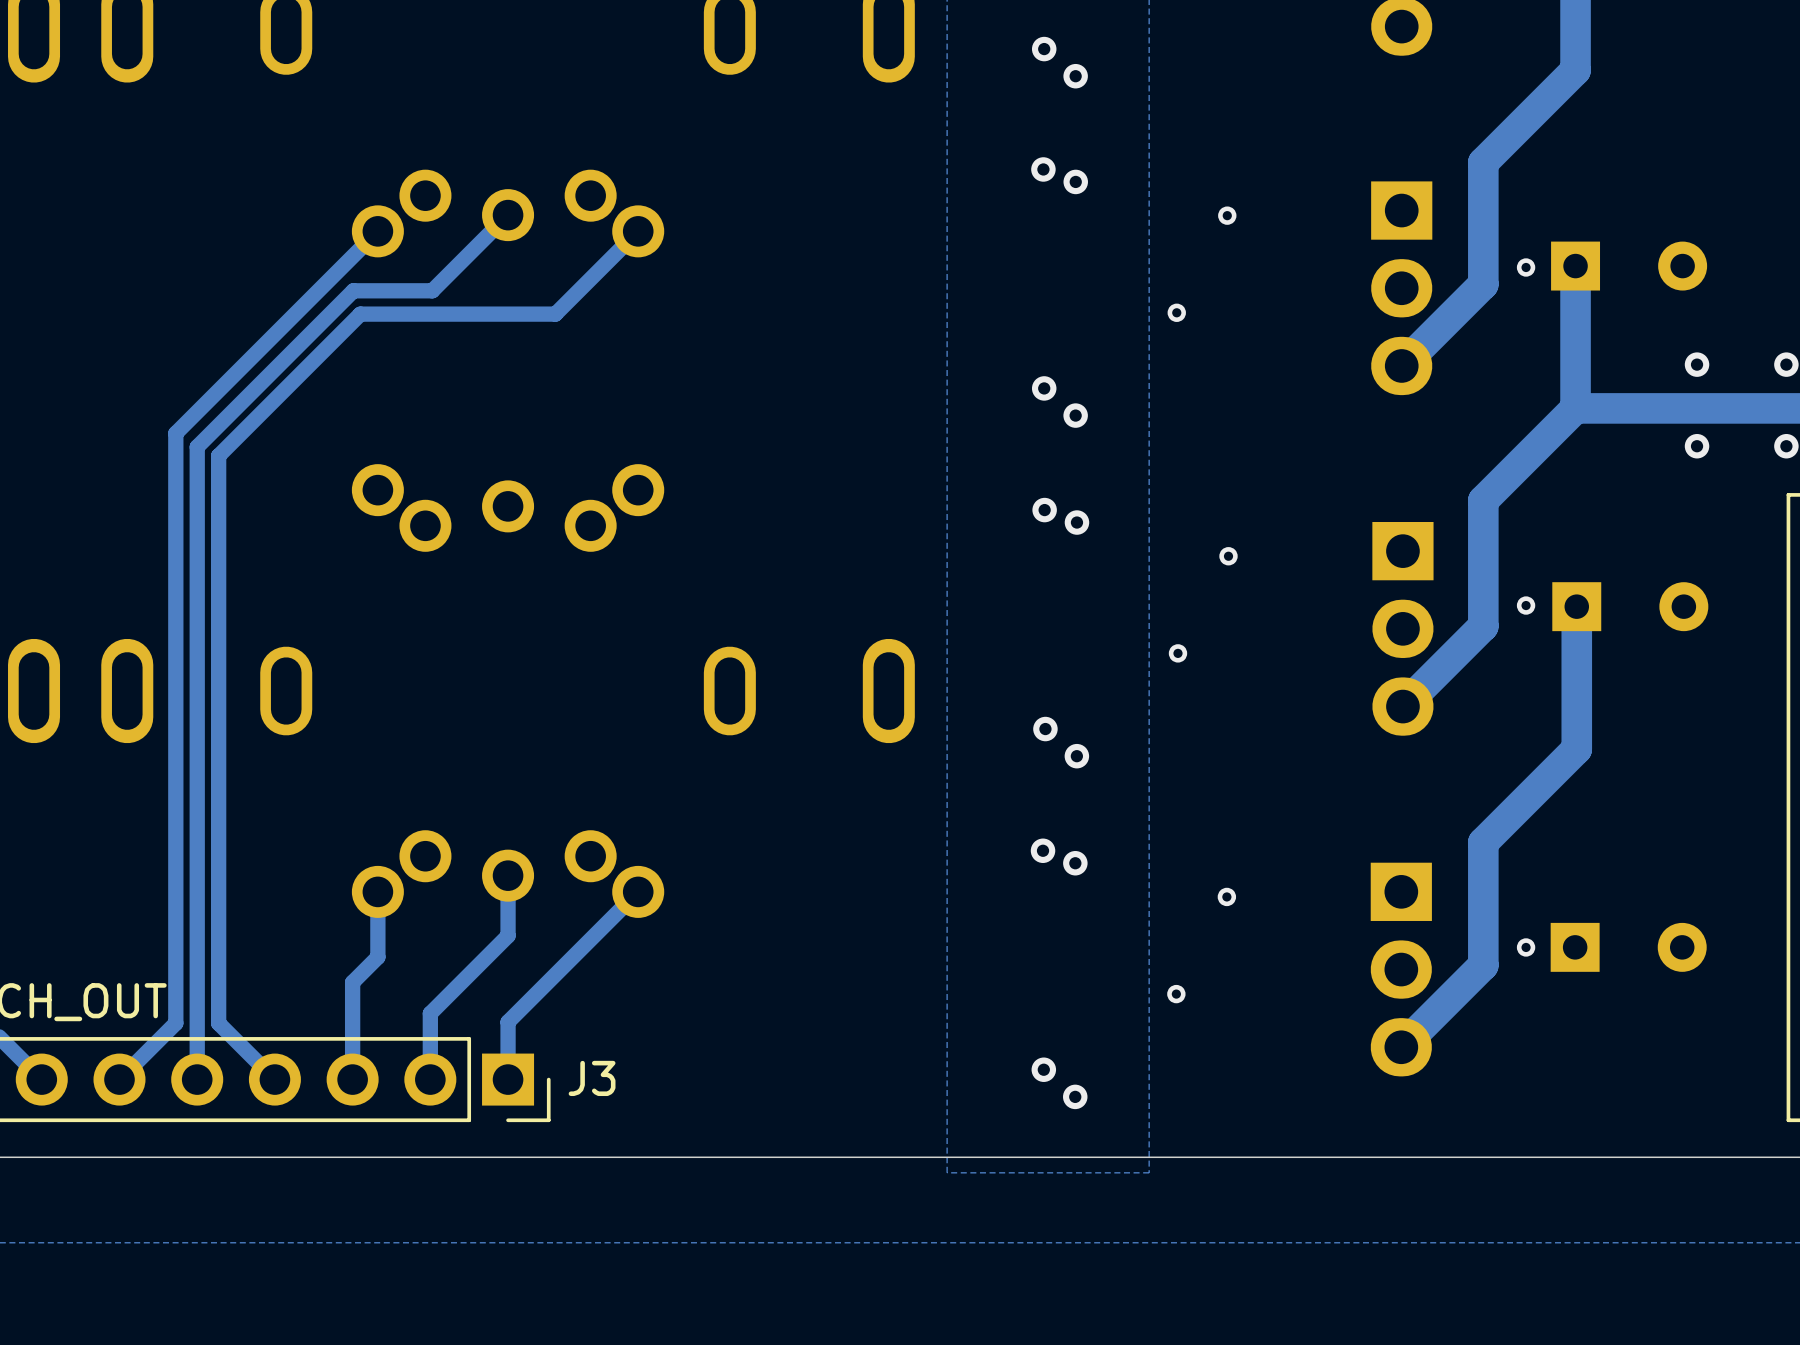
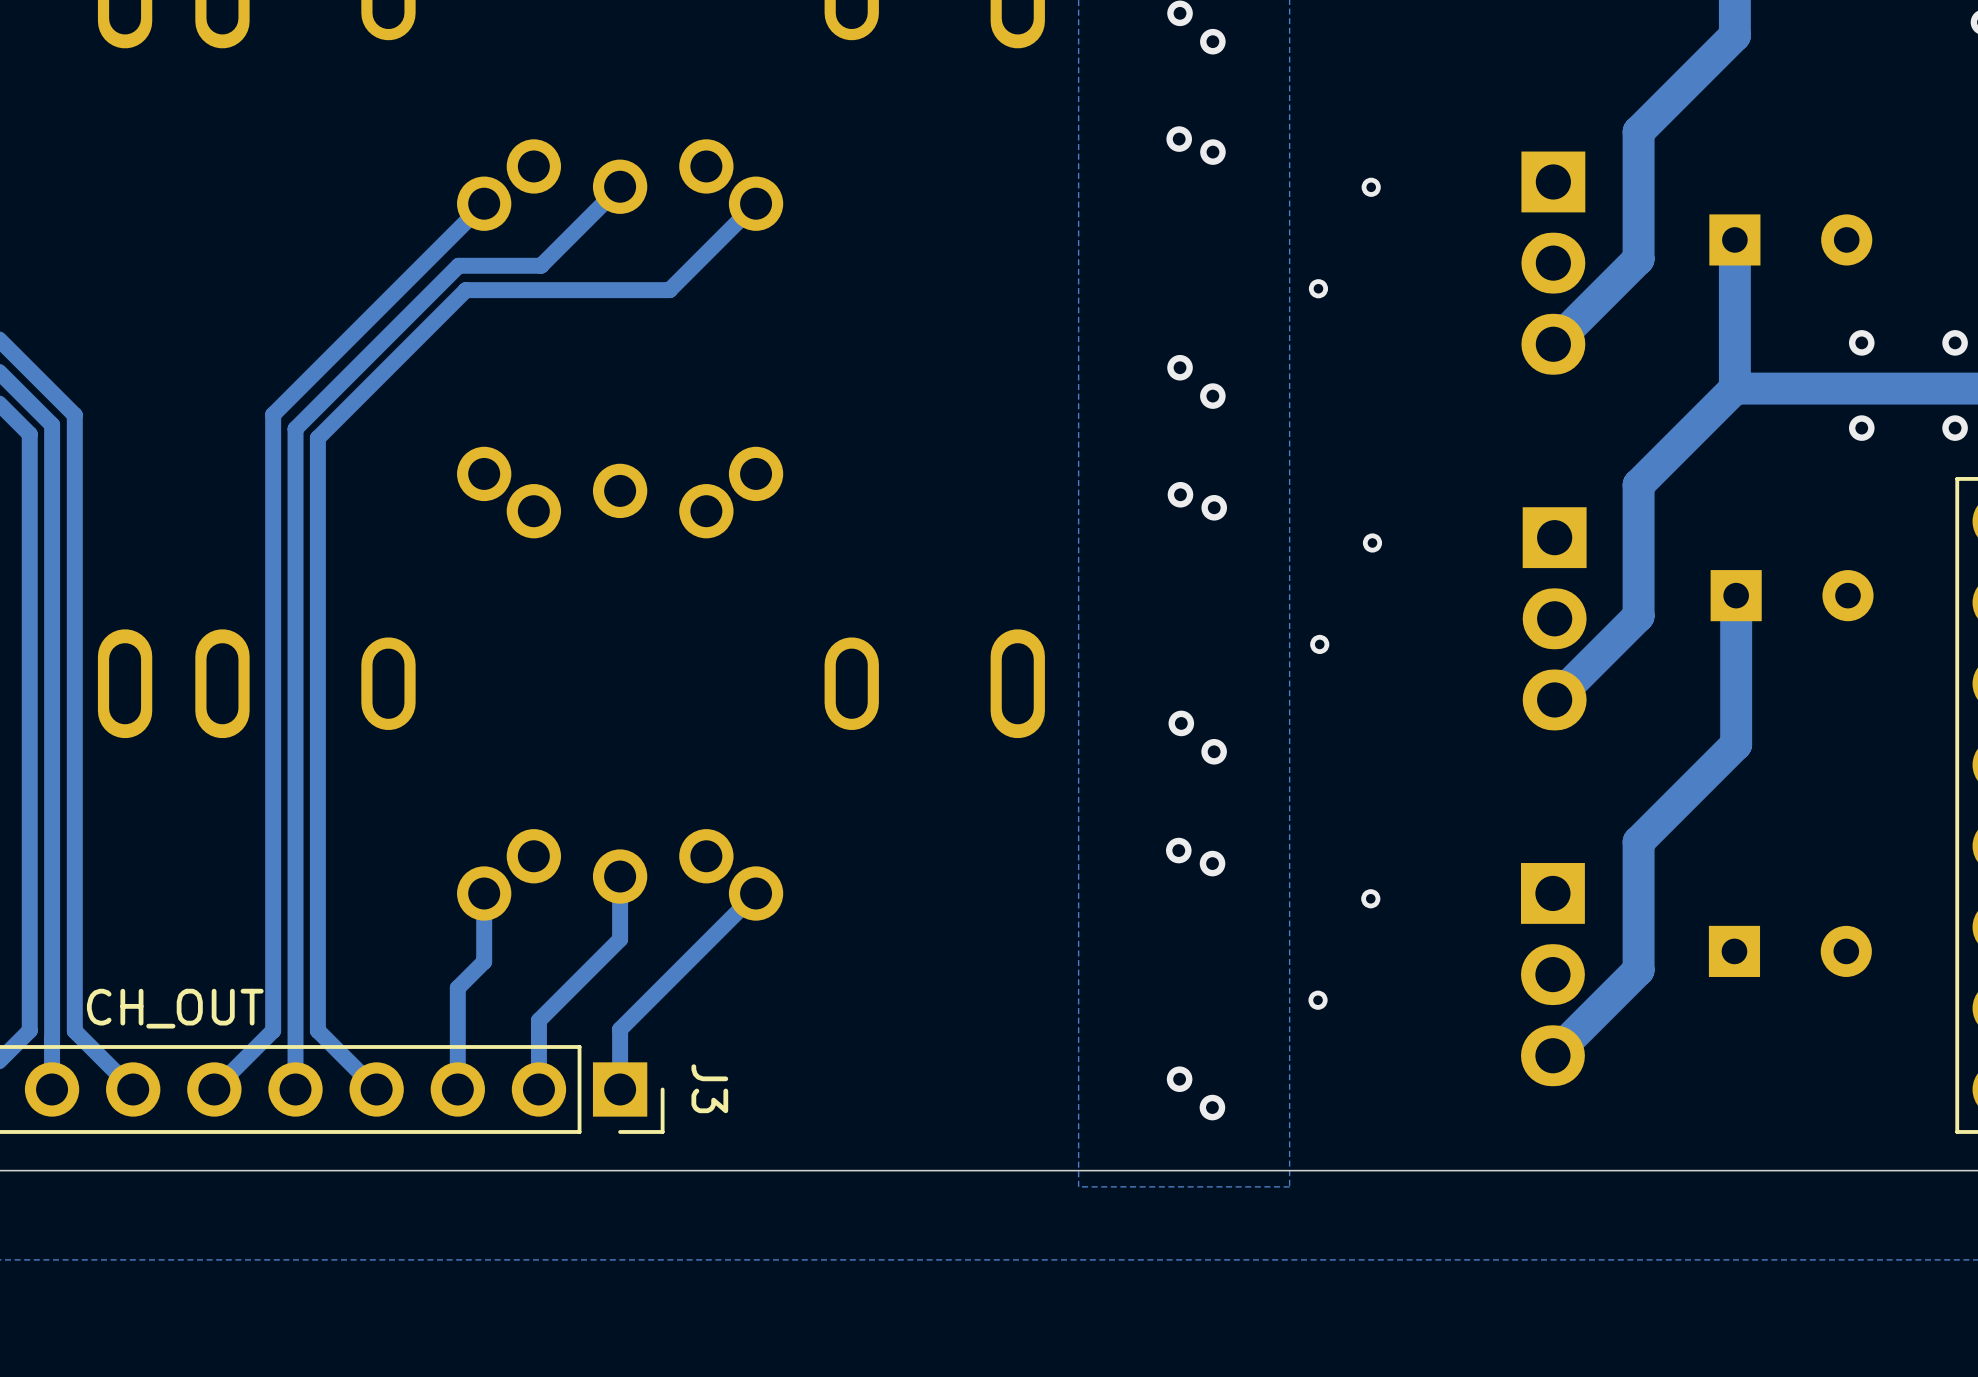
via: (1526, 267) -> none
via: (1526, 605) -> none
via: (1526, 947) -> none
J3 name rotation: 0° (592, 1078) -> 90° clockwise (709, 1088)

